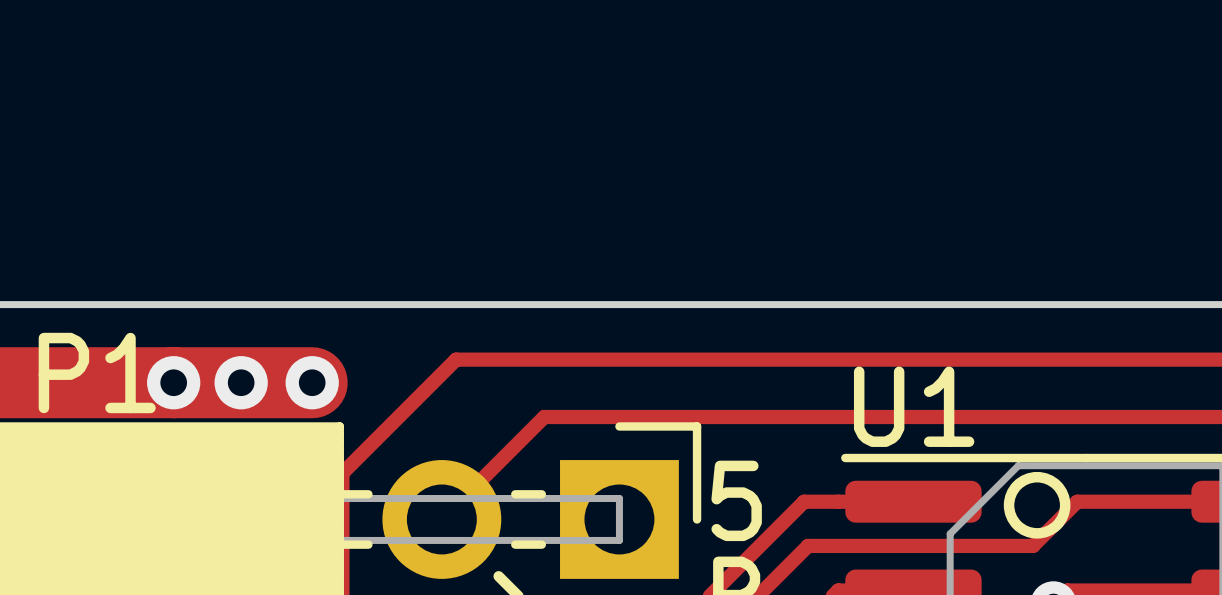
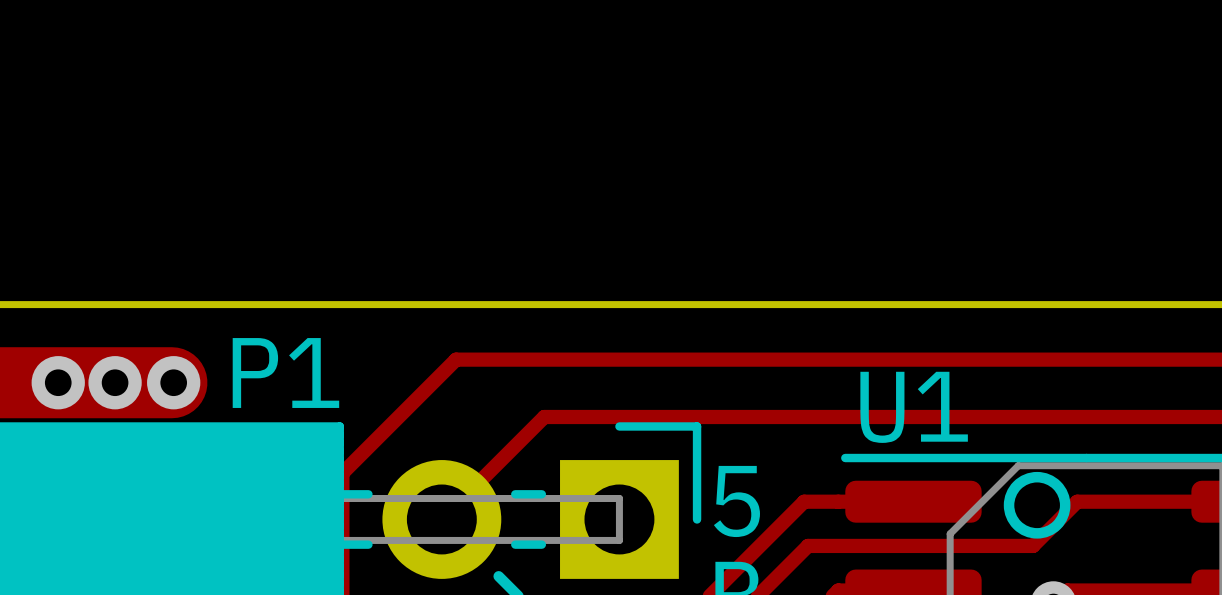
P1 name position: P1 (97, 373) -> P1 (285, 373)
via: none -> (58, 382)
via: none -> (115, 382)
track: (171, 382) (312, 382) -> none
via: (241, 382) -> none
via: (312, 382) -> none

